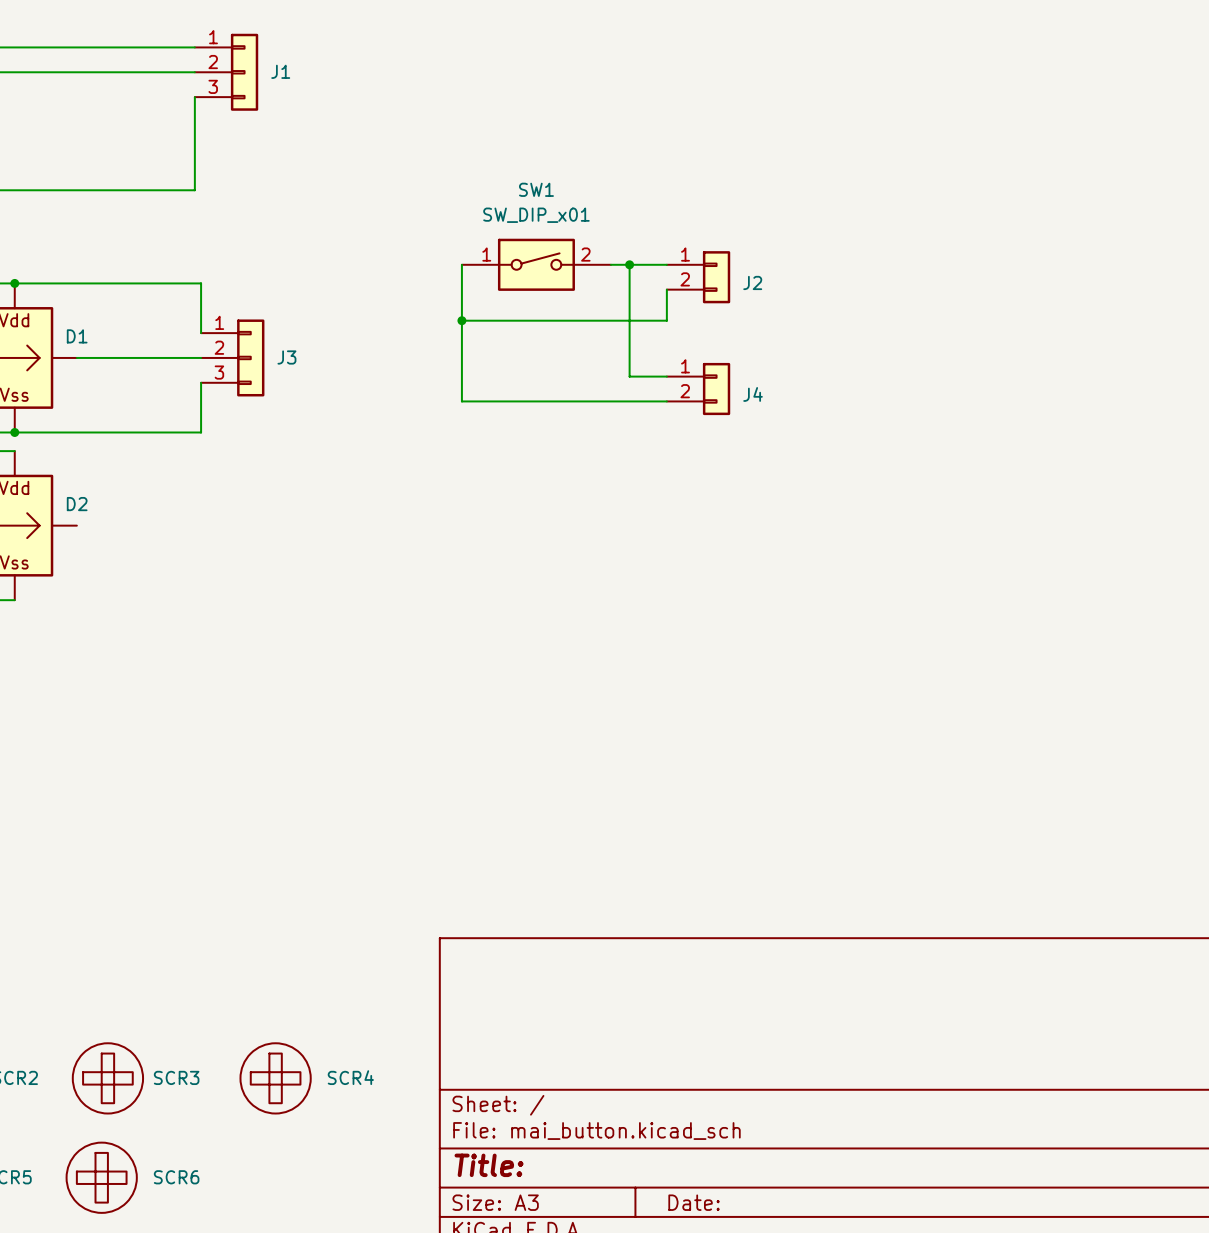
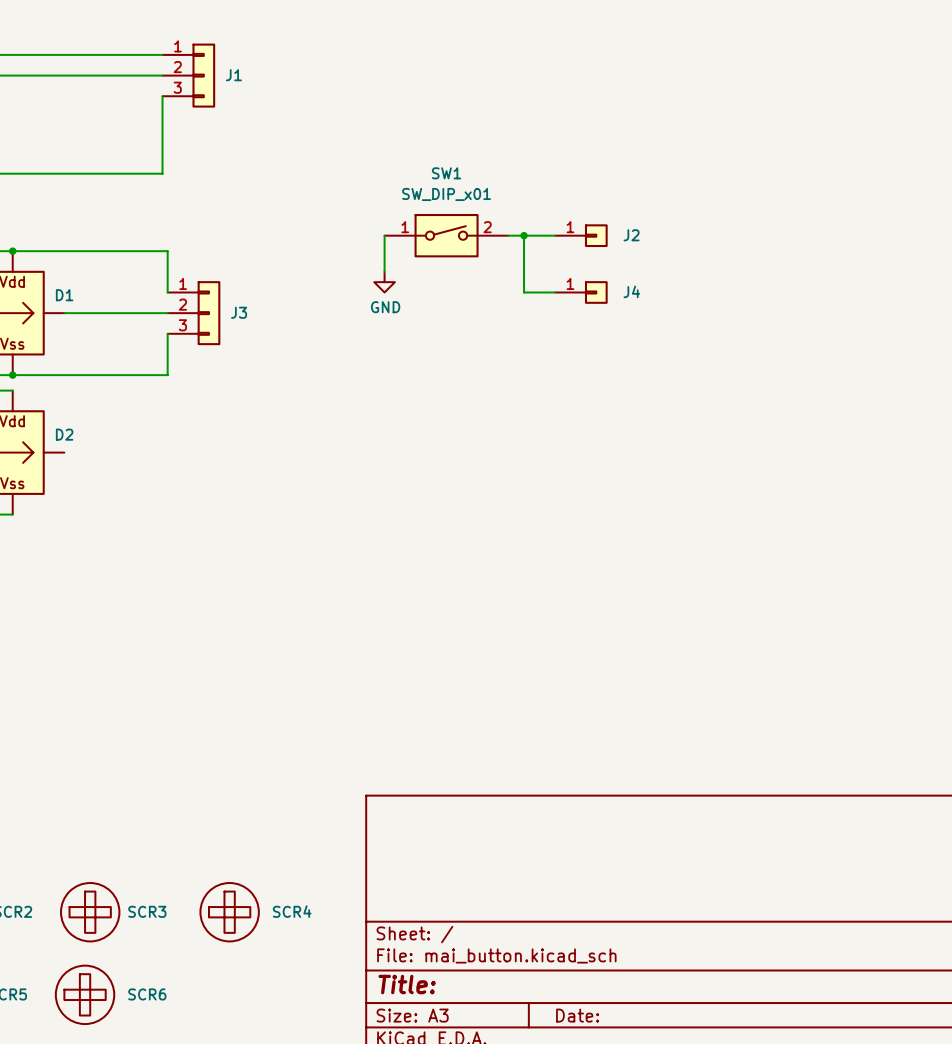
J2 symbol: [666, 251, 731, 304] -> [555, 224, 608, 248]
wire: (666, 289) (666, 320) (461, 320) -> none
wire: (461, 308) (461, 401) (666, 401) -> none
junction: (461, 320) -> none
power symbol: none -> GND (384, 282)
wire: (629, 333) (629, 376) (666, 376) -> (524, 292) (555, 292)
J4 symbol: [666, 362, 731, 416] -> [555, 281, 608, 304]

